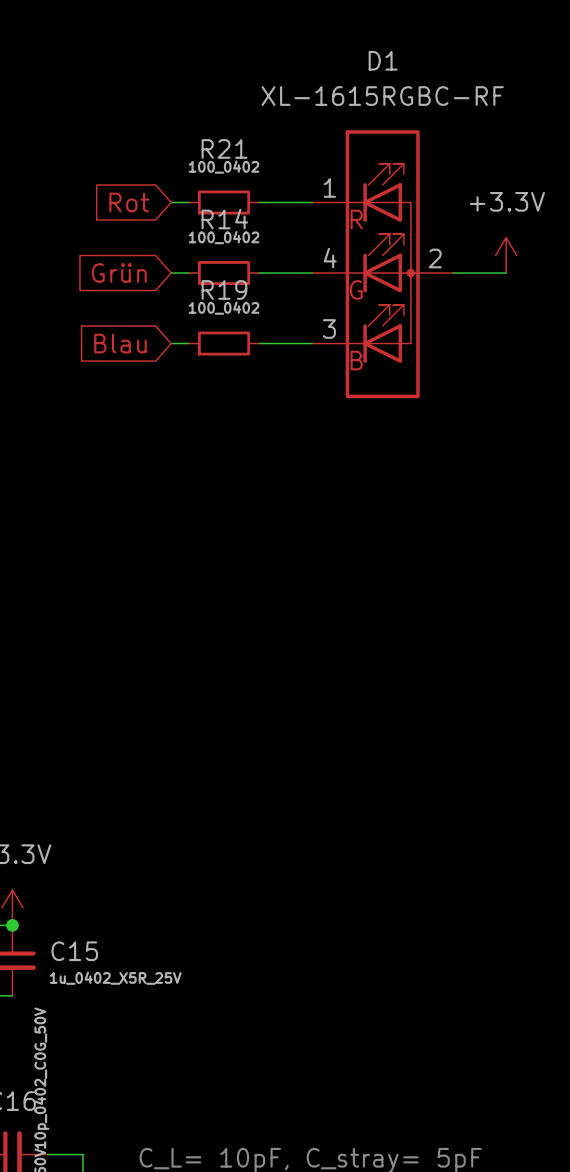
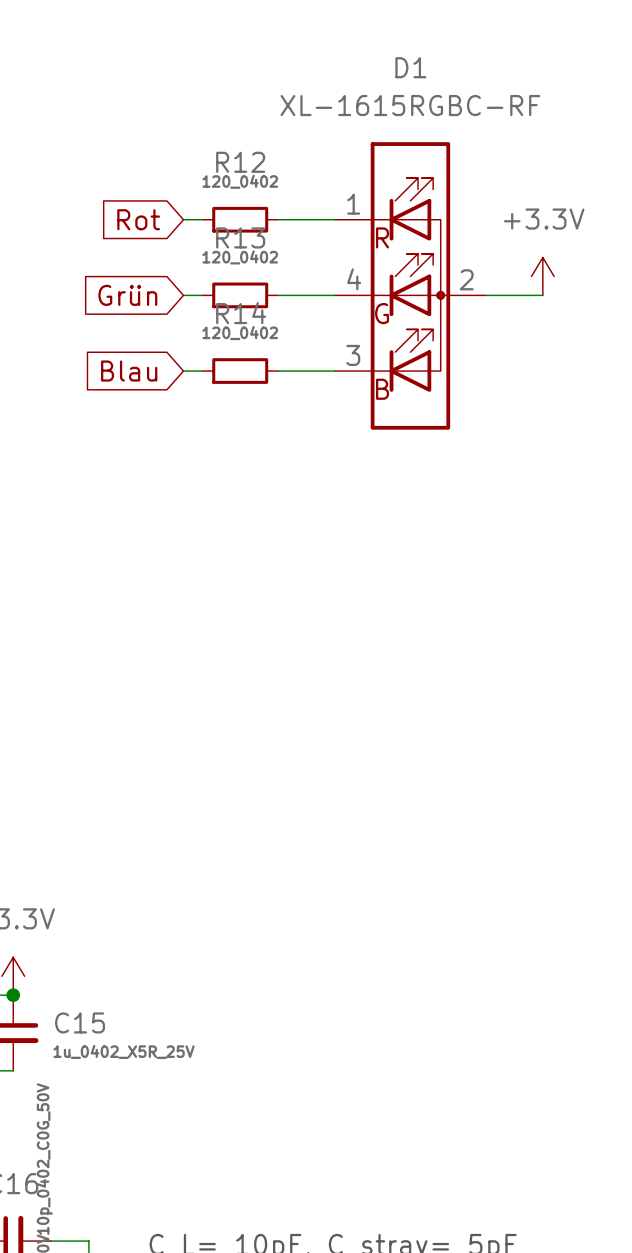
R21 name: R21 (224, 148) -> R12 (240, 162)
R21 value: 100_0402 (224, 167) -> 120_0402 (240, 181)
R14 name: R14 (224, 219) -> R13 (240, 237)
R14 value: 100_0402 (224, 237) -> 120_0402 (240, 257)
R19 name: R19 (224, 289) -> R14 (241, 313)
R19 value: 100_0402 (224, 308) -> 120_0402 (240, 333)

